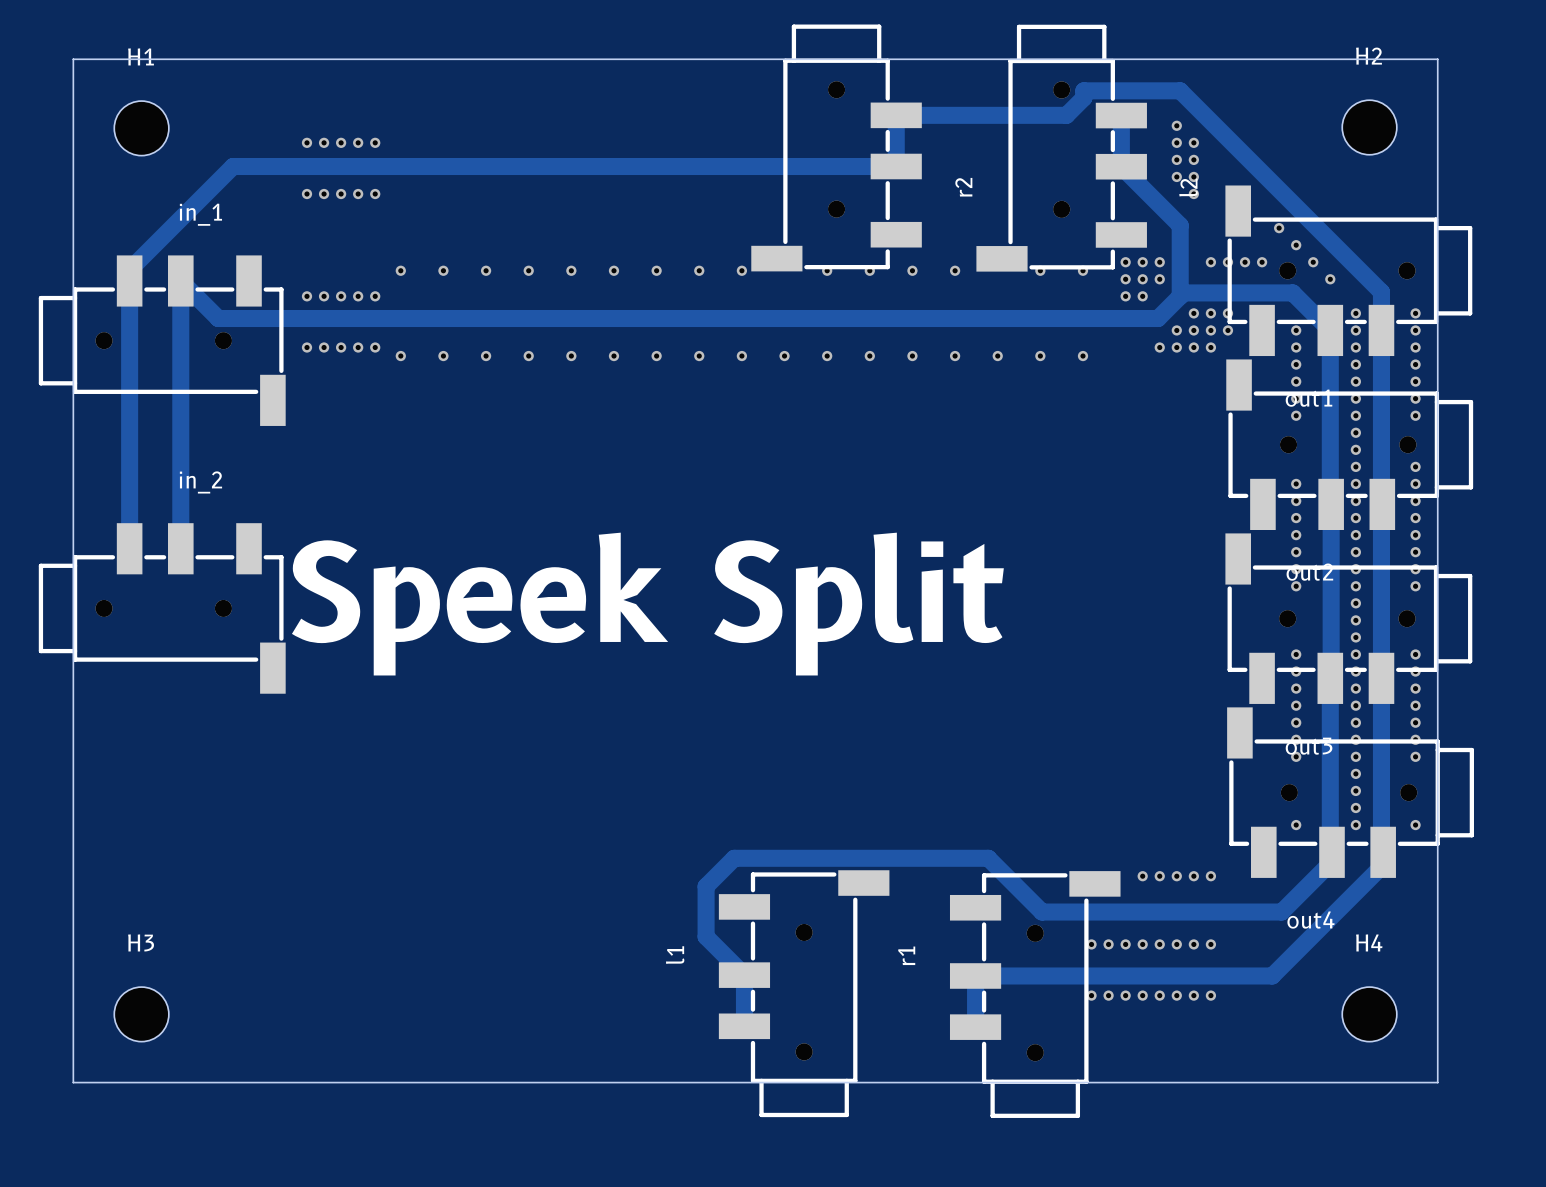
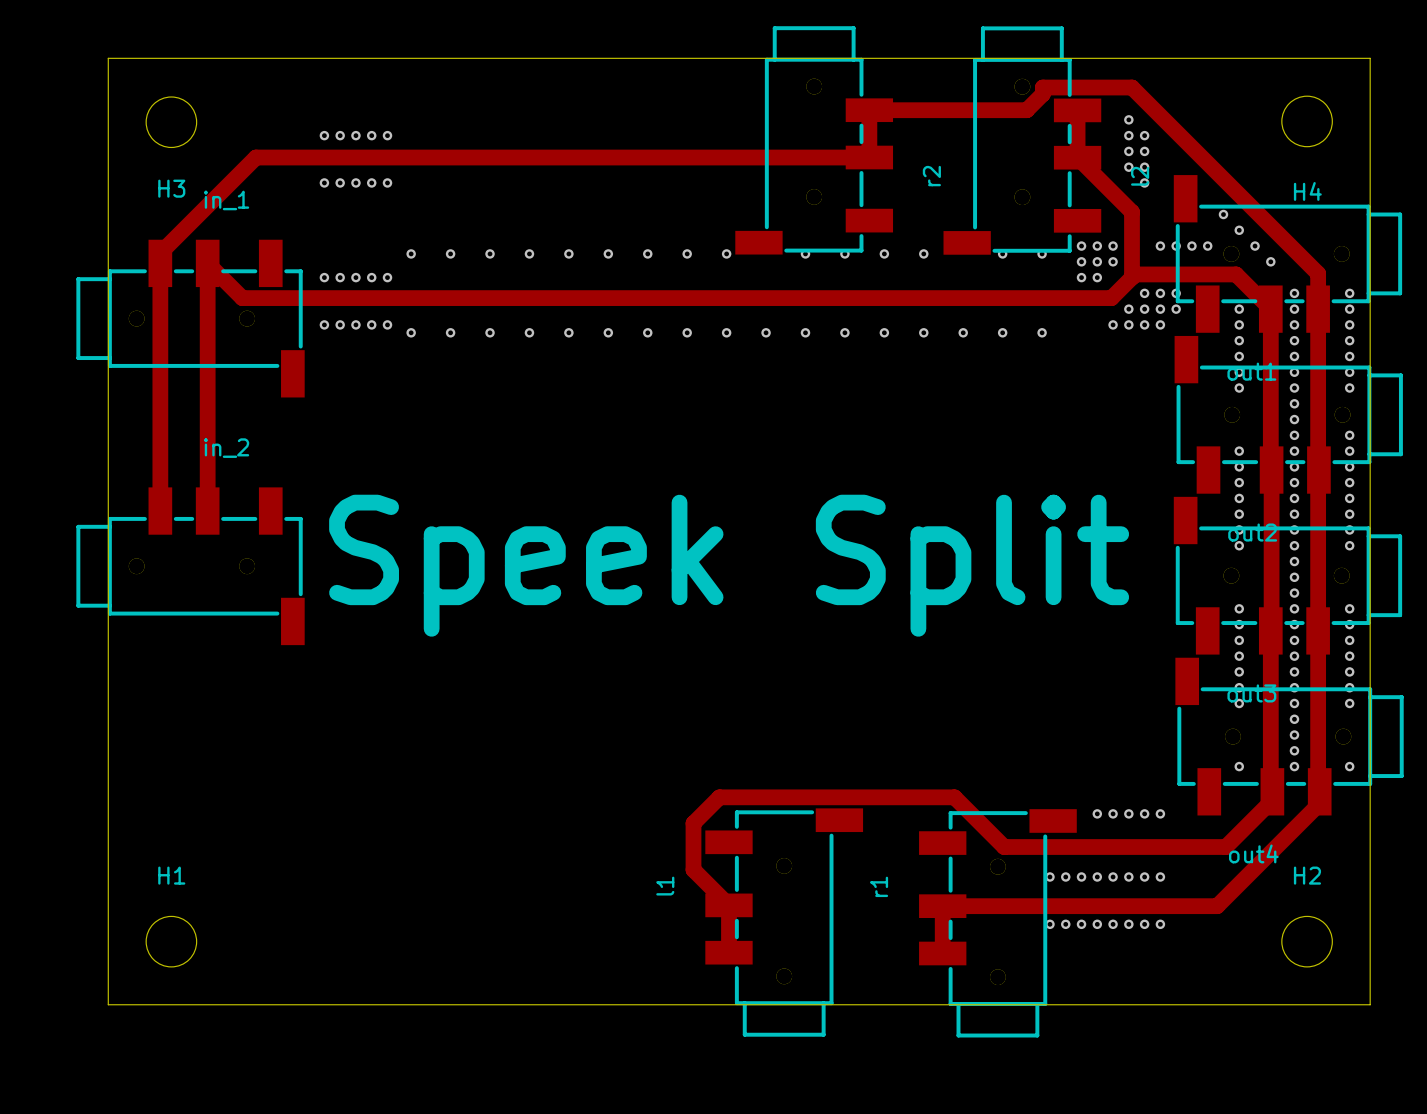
H1 name: H1 (141, 56) -> H3 (171, 188)
H2 name: H2 (1369, 56) -> H4 (1307, 191)
H3 name: H3 (141, 942) -> H1 (171, 875)
H4 name: H4 (1369, 942) -> H2 (1307, 875)

